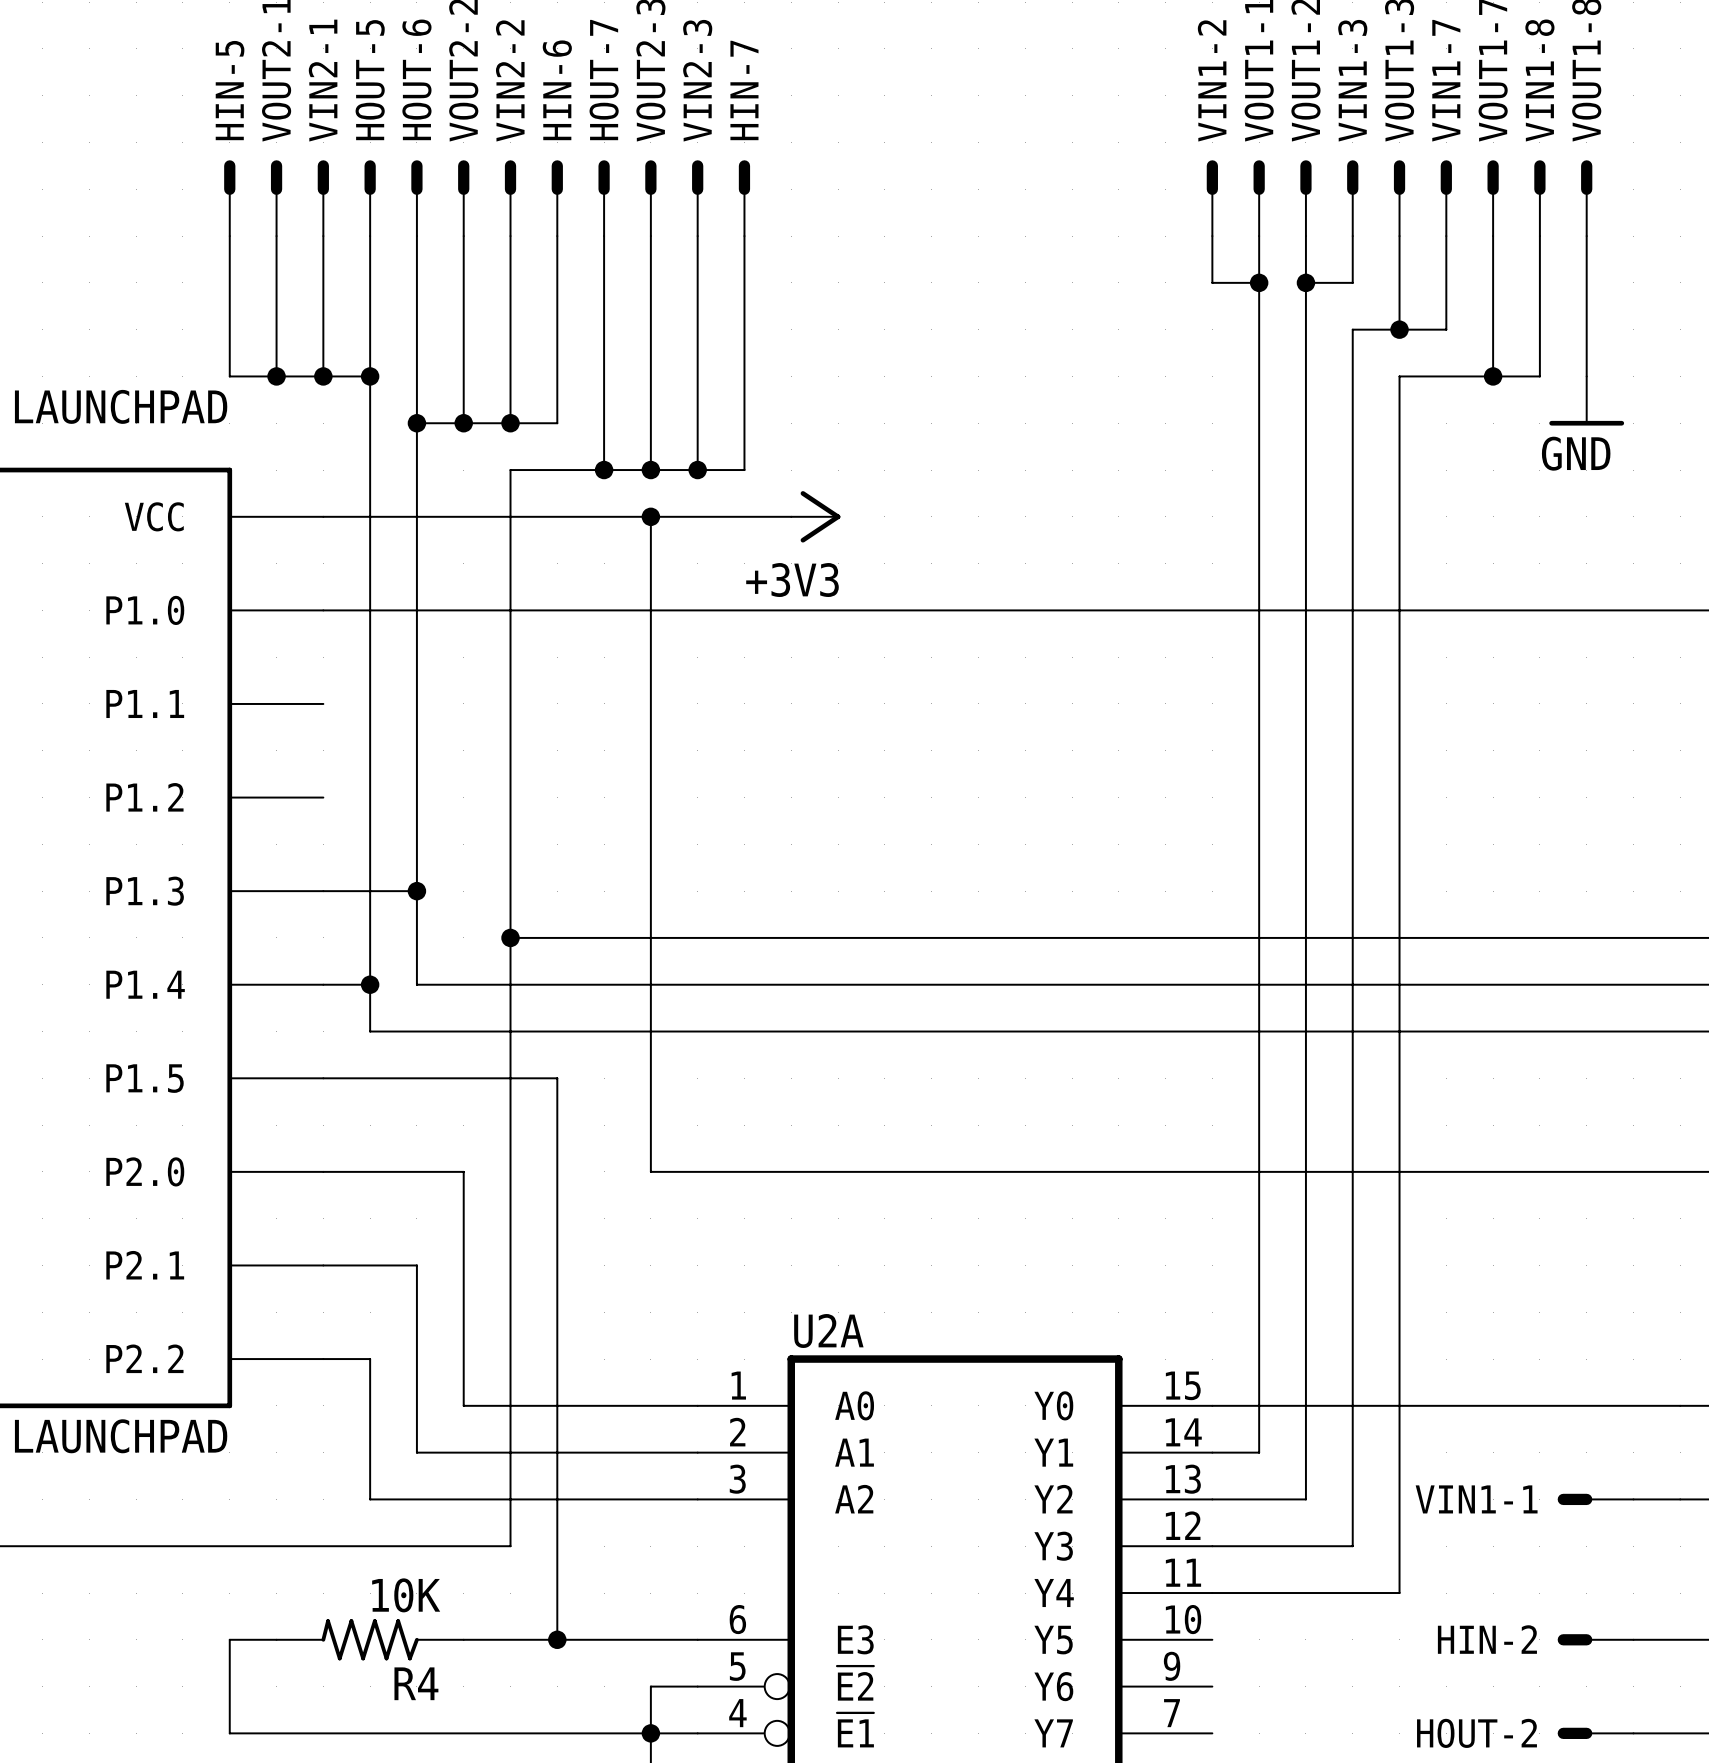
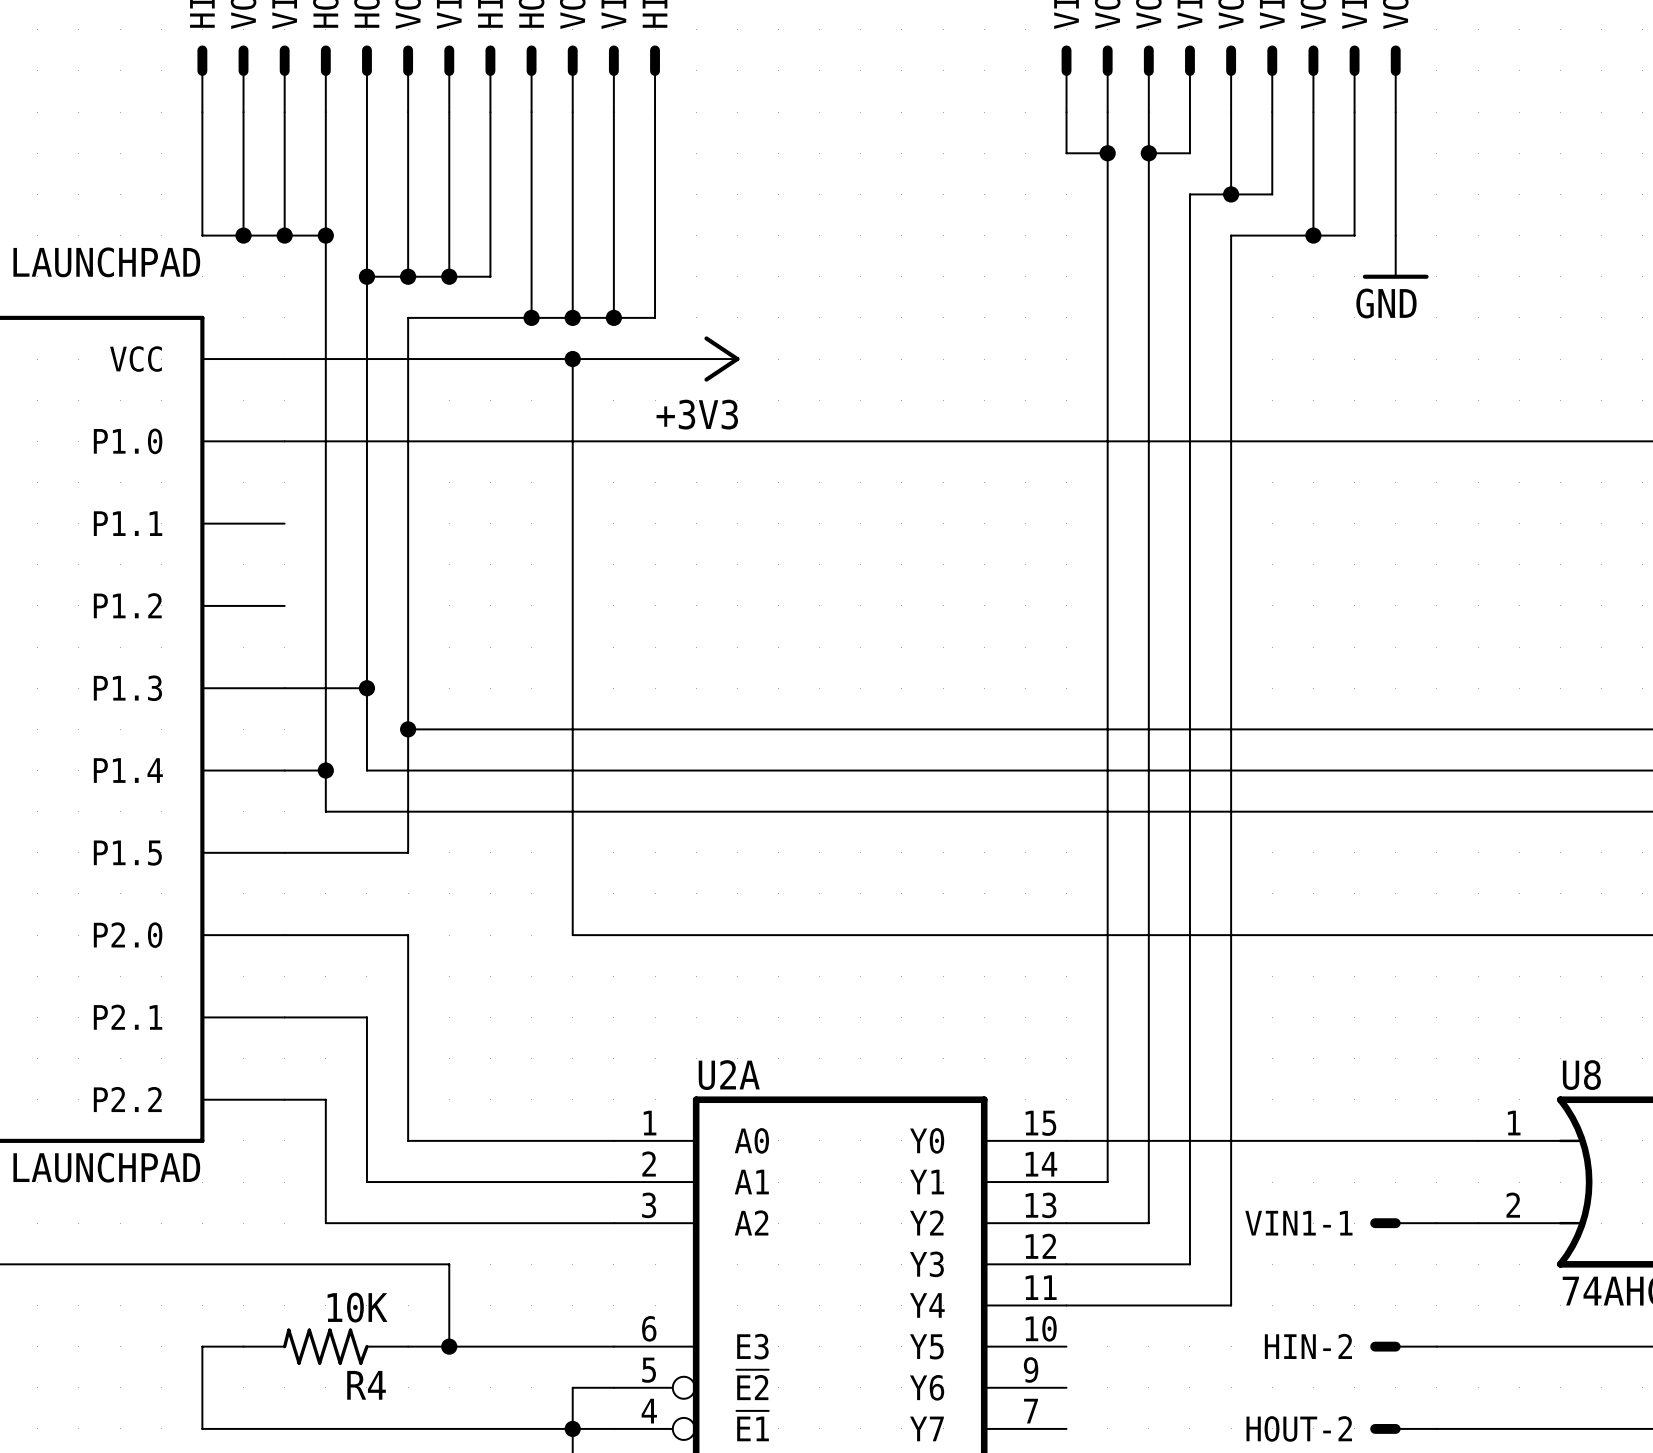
wire: (510, 470) (510, 1546) -> (449, 317) (408, 317) (408, 852)
wire: none -> (408, 729) (449, 729)
junction position: (510, 937) -> (408, 729)
wire: (463, 1078) (557, 1078) (557, 1639) -> none
wire: none -> (449, 1264) (449, 1346)
junction position: (557, 1639) -> (449, 1346)

